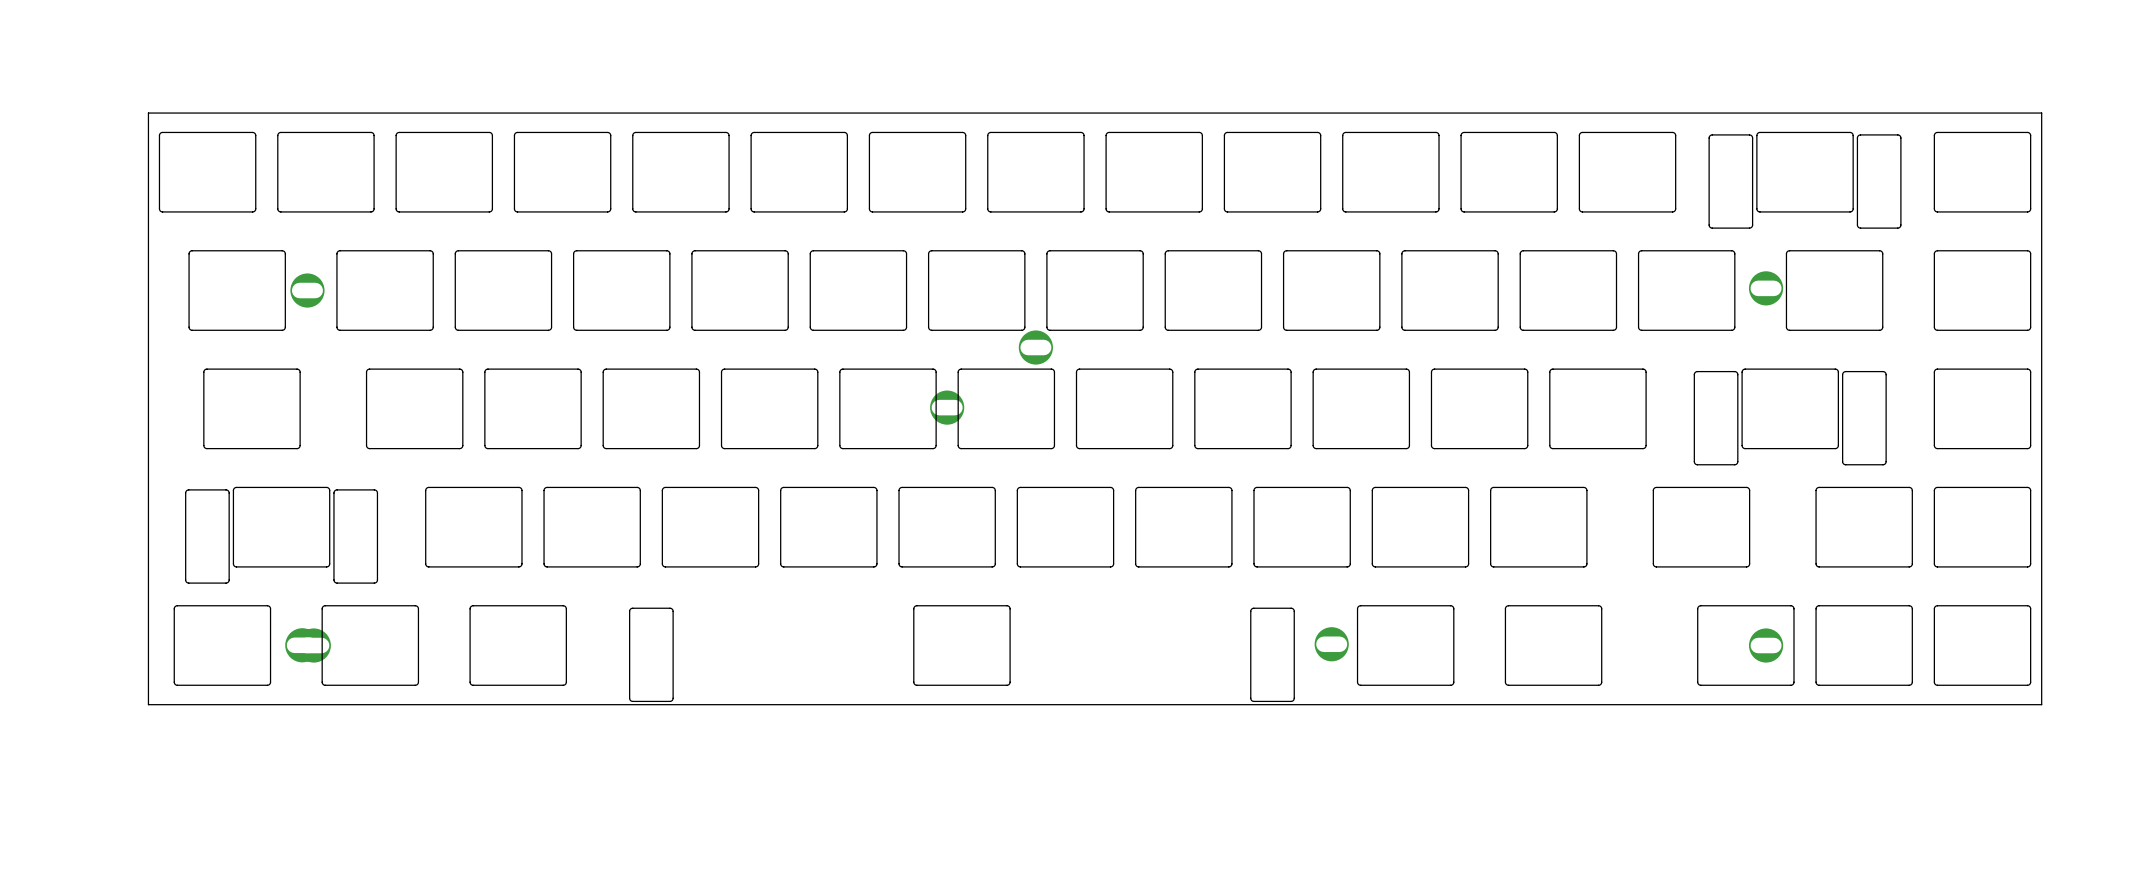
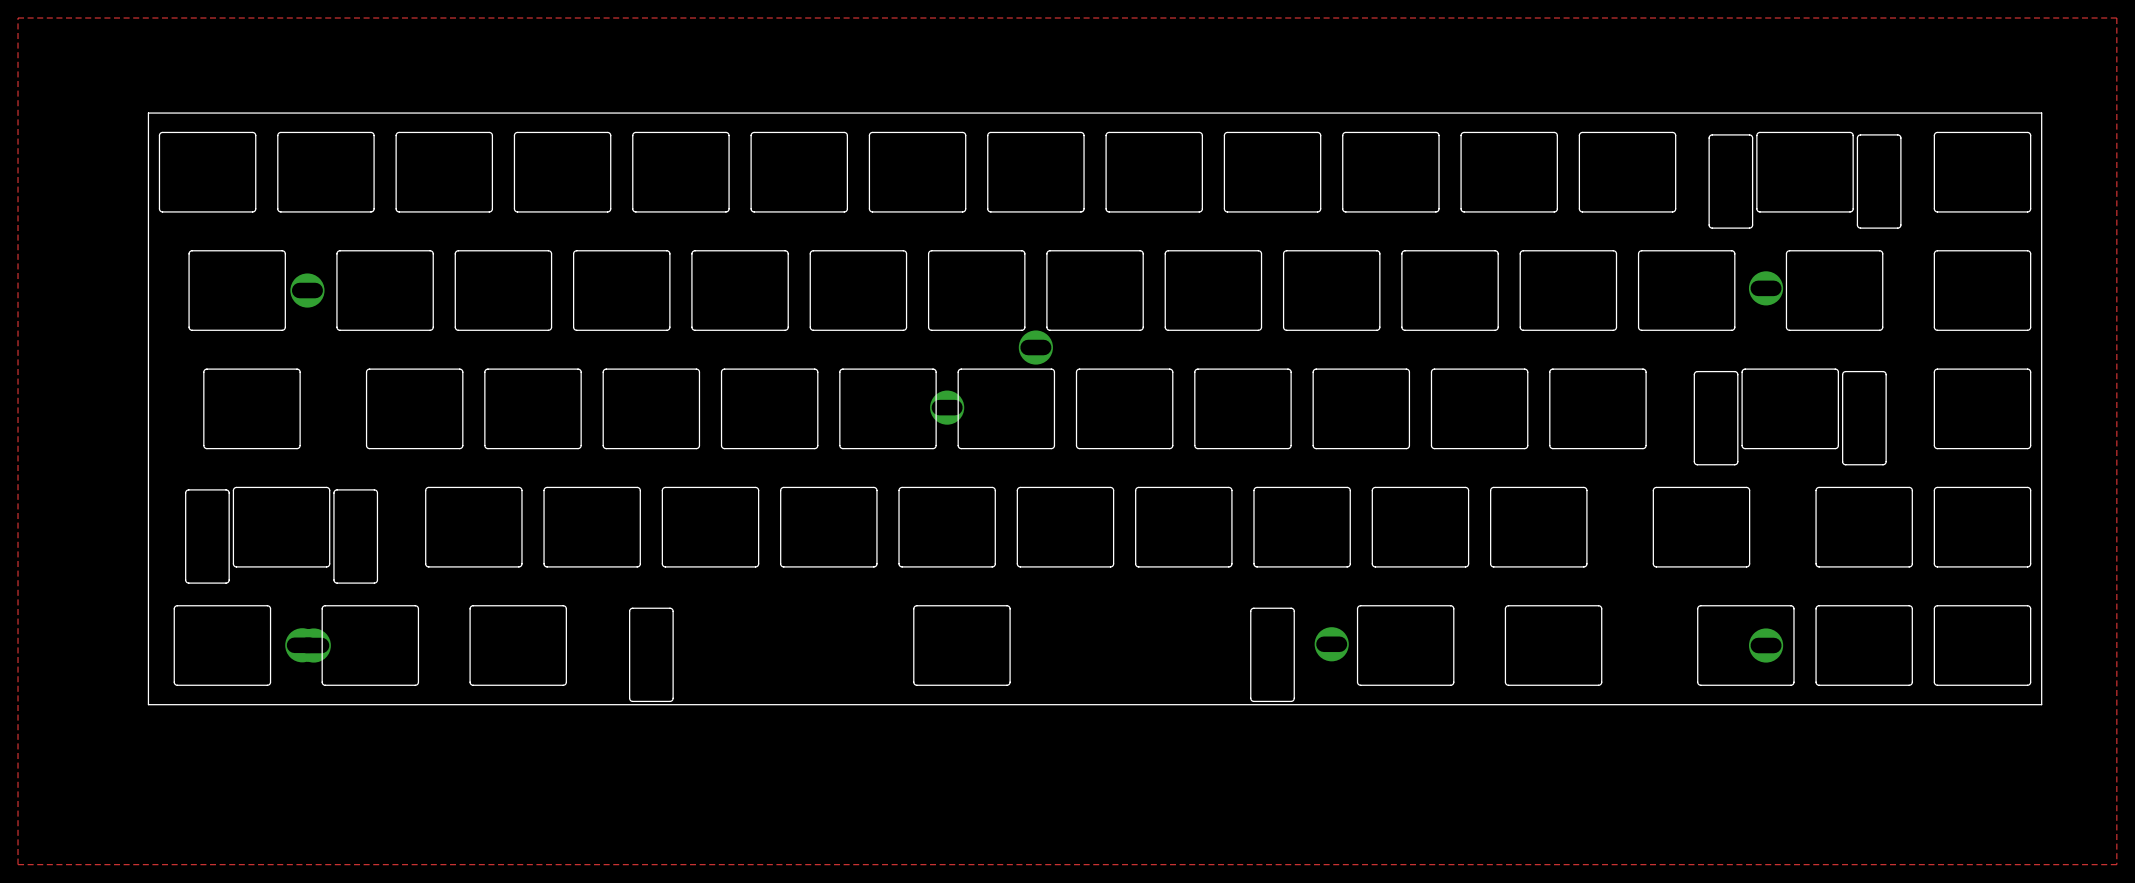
zone outline: none -> (18, 18) (18, 864) (2116, 864) (2116, 18) (18, 18)

